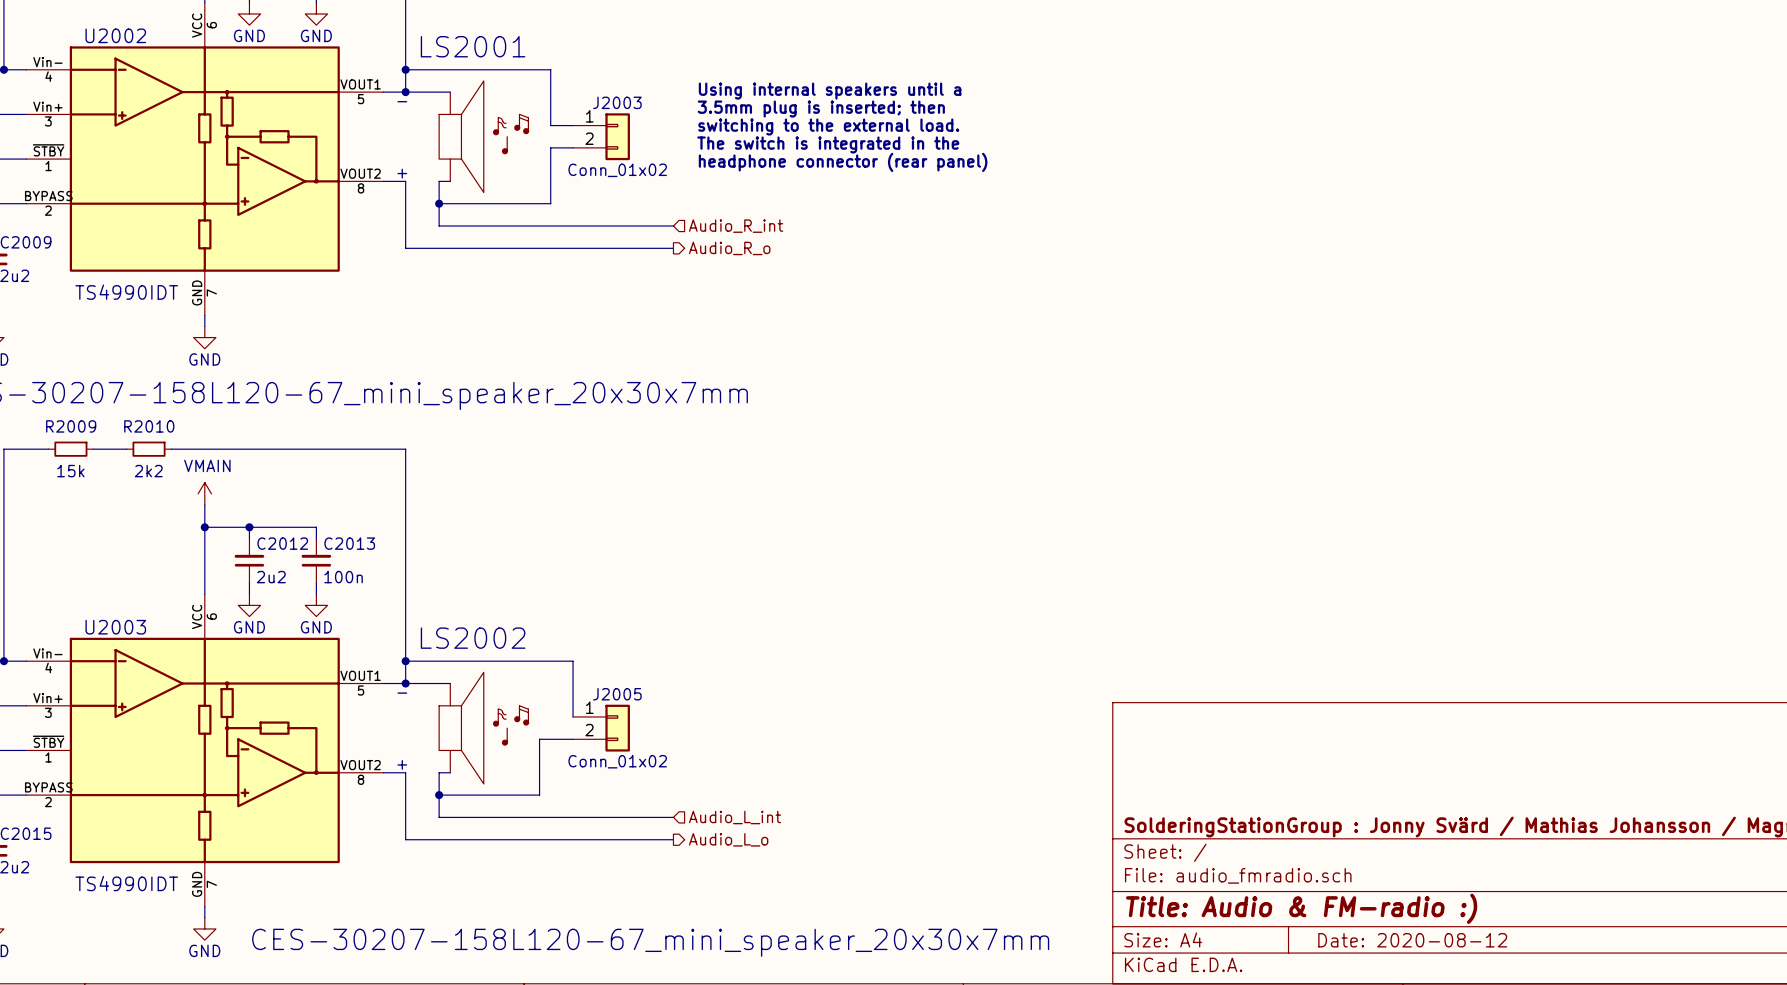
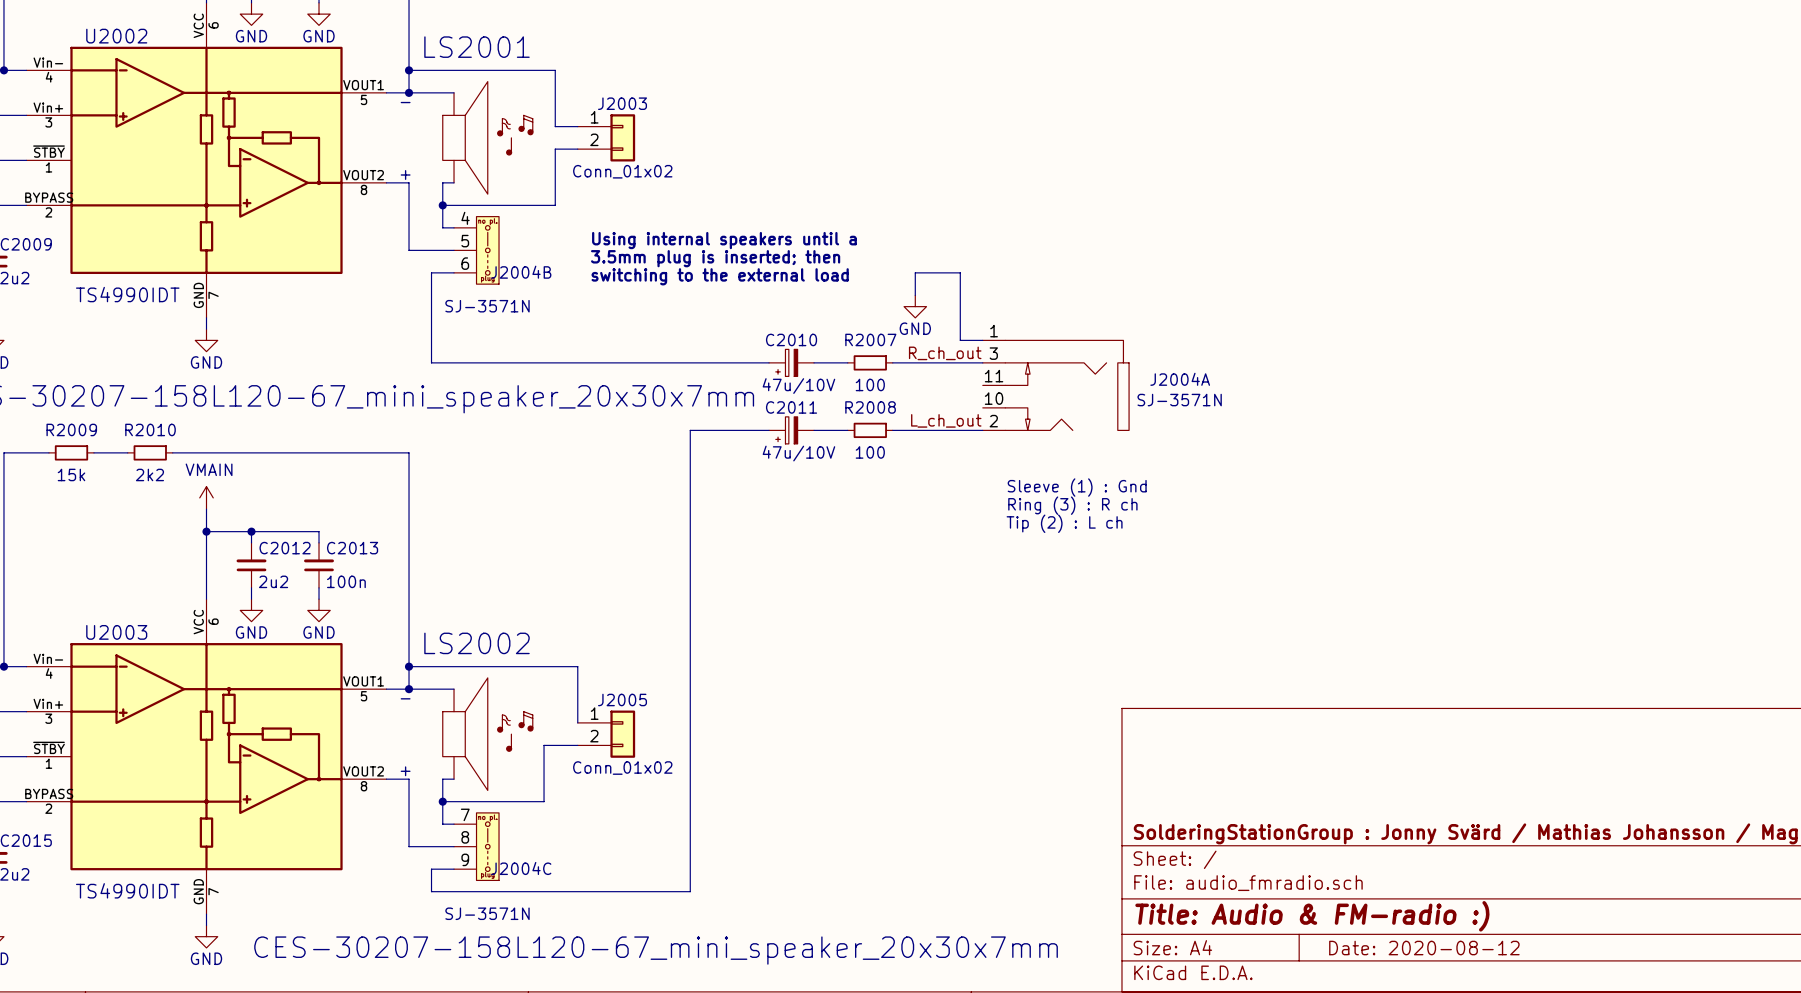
text position: Using internal speakers until a (830, 91) -> Using internal speakers until a (724, 240)
text position: 3.5mm plug is inserted; then (821, 109) -> 3.5mm plug is inserted; then (715, 258)
text: switching to the external load. (828, 127) -> none
text: The switch is integrated in the (828, 144) -> none
text: headphone connector (rear panel) (843, 162) -> none
wire: (450, 226) (673, 226) -> none
hierarchical label: Audio_R_int (736, 226) -> none
wire: (450, 248) (673, 248) -> none
J2004B: none -> SJ-3571N (476, 250)
hierarchical label: Audio_R_o (729, 248) -> none
wire: none -> (454, 272) (431, 272) (431, 362) (769, 362)
text: none -> switching to the external load (720, 276)
wire: none -> (915, 295) (915, 272) (960, 272) (960, 340) (982, 340)
power symbol: none -> GND (915, 306)
label: none -> R_ch_out (945, 353)
C2010: none -> 47u/10V (791, 362)
wire: none -> (814, 362) (847, 362)
R2007: none -> 100 (870, 362)
wire: none -> (892, 362) (982, 362)
J2004A: none -> SJ-3571N (1055, 385)
label: none -> L_ch_out (946, 420)
wire: none -> (769, 430) (690, 430) (690, 891) (431, 891) (431, 869) (454, 869)
C2011: none -> 47u/10V (791, 430)
wire: none -> (814, 430) (847, 430)
R2008: none -> 100 (870, 430)
wire: none -> (892, 430) (982, 430)
text: none -> Sleeve (1) : Gnd (1077, 487)
text: none -> Ring (3) : R ch (1072, 505)
text: none -> Tip (2) : L ch (1064, 523)
wire: (450, 817) (673, 817) -> none
hierarchical label: Audio_L_int (735, 817) -> none
wire: (450, 839) (673, 839) -> none
J2004C: none -> SJ-3571N (476, 846)
hierarchical label: Audio_L_o (728, 839) -> none

